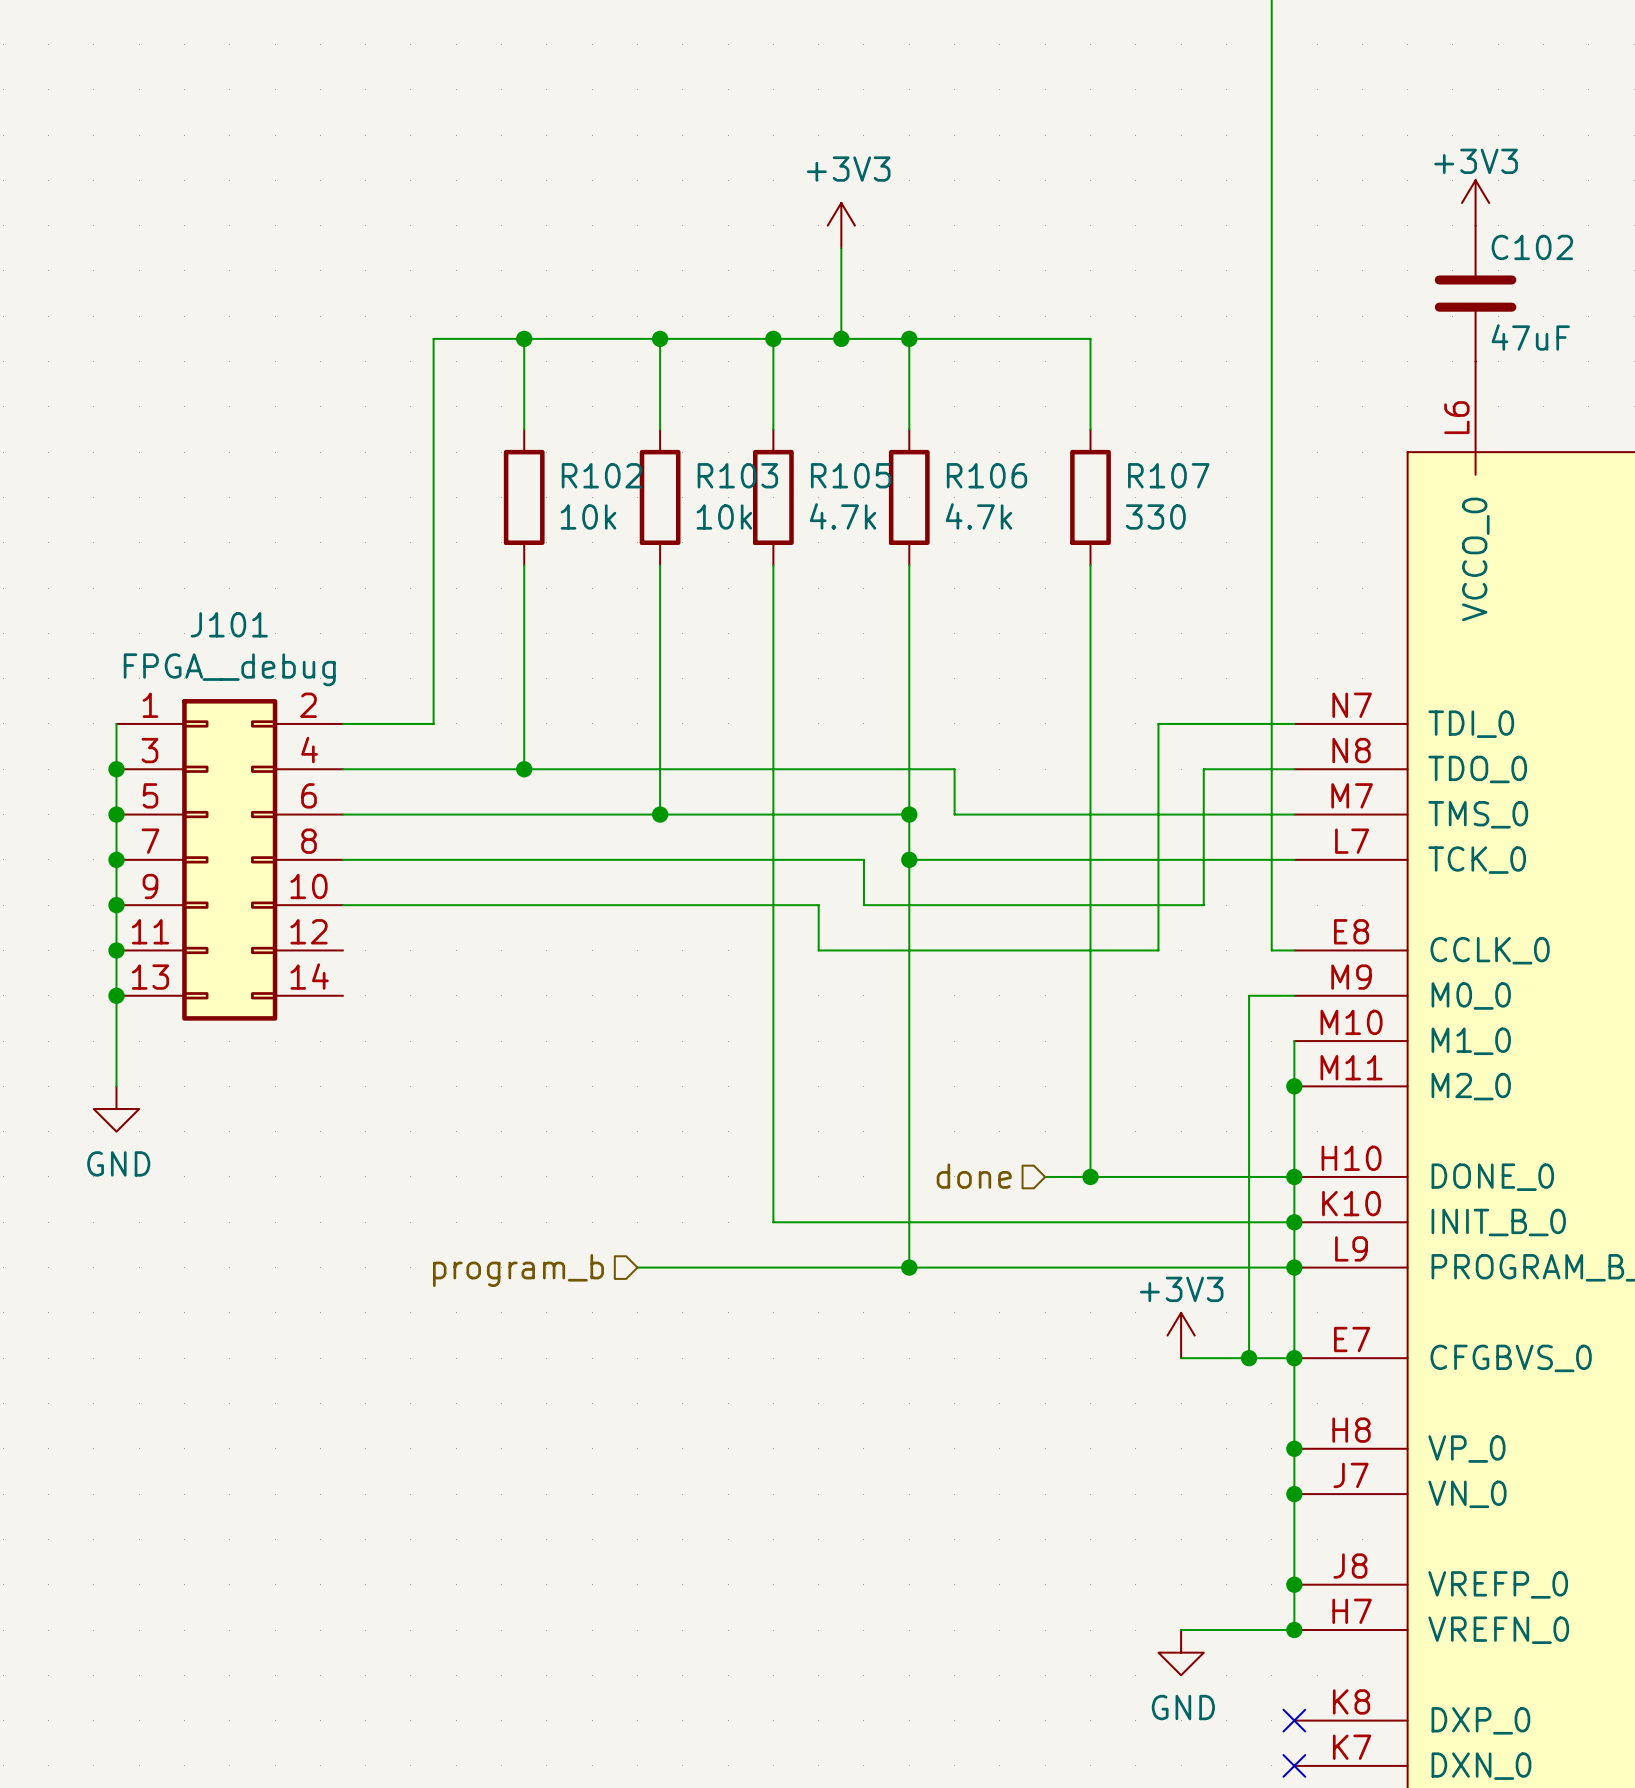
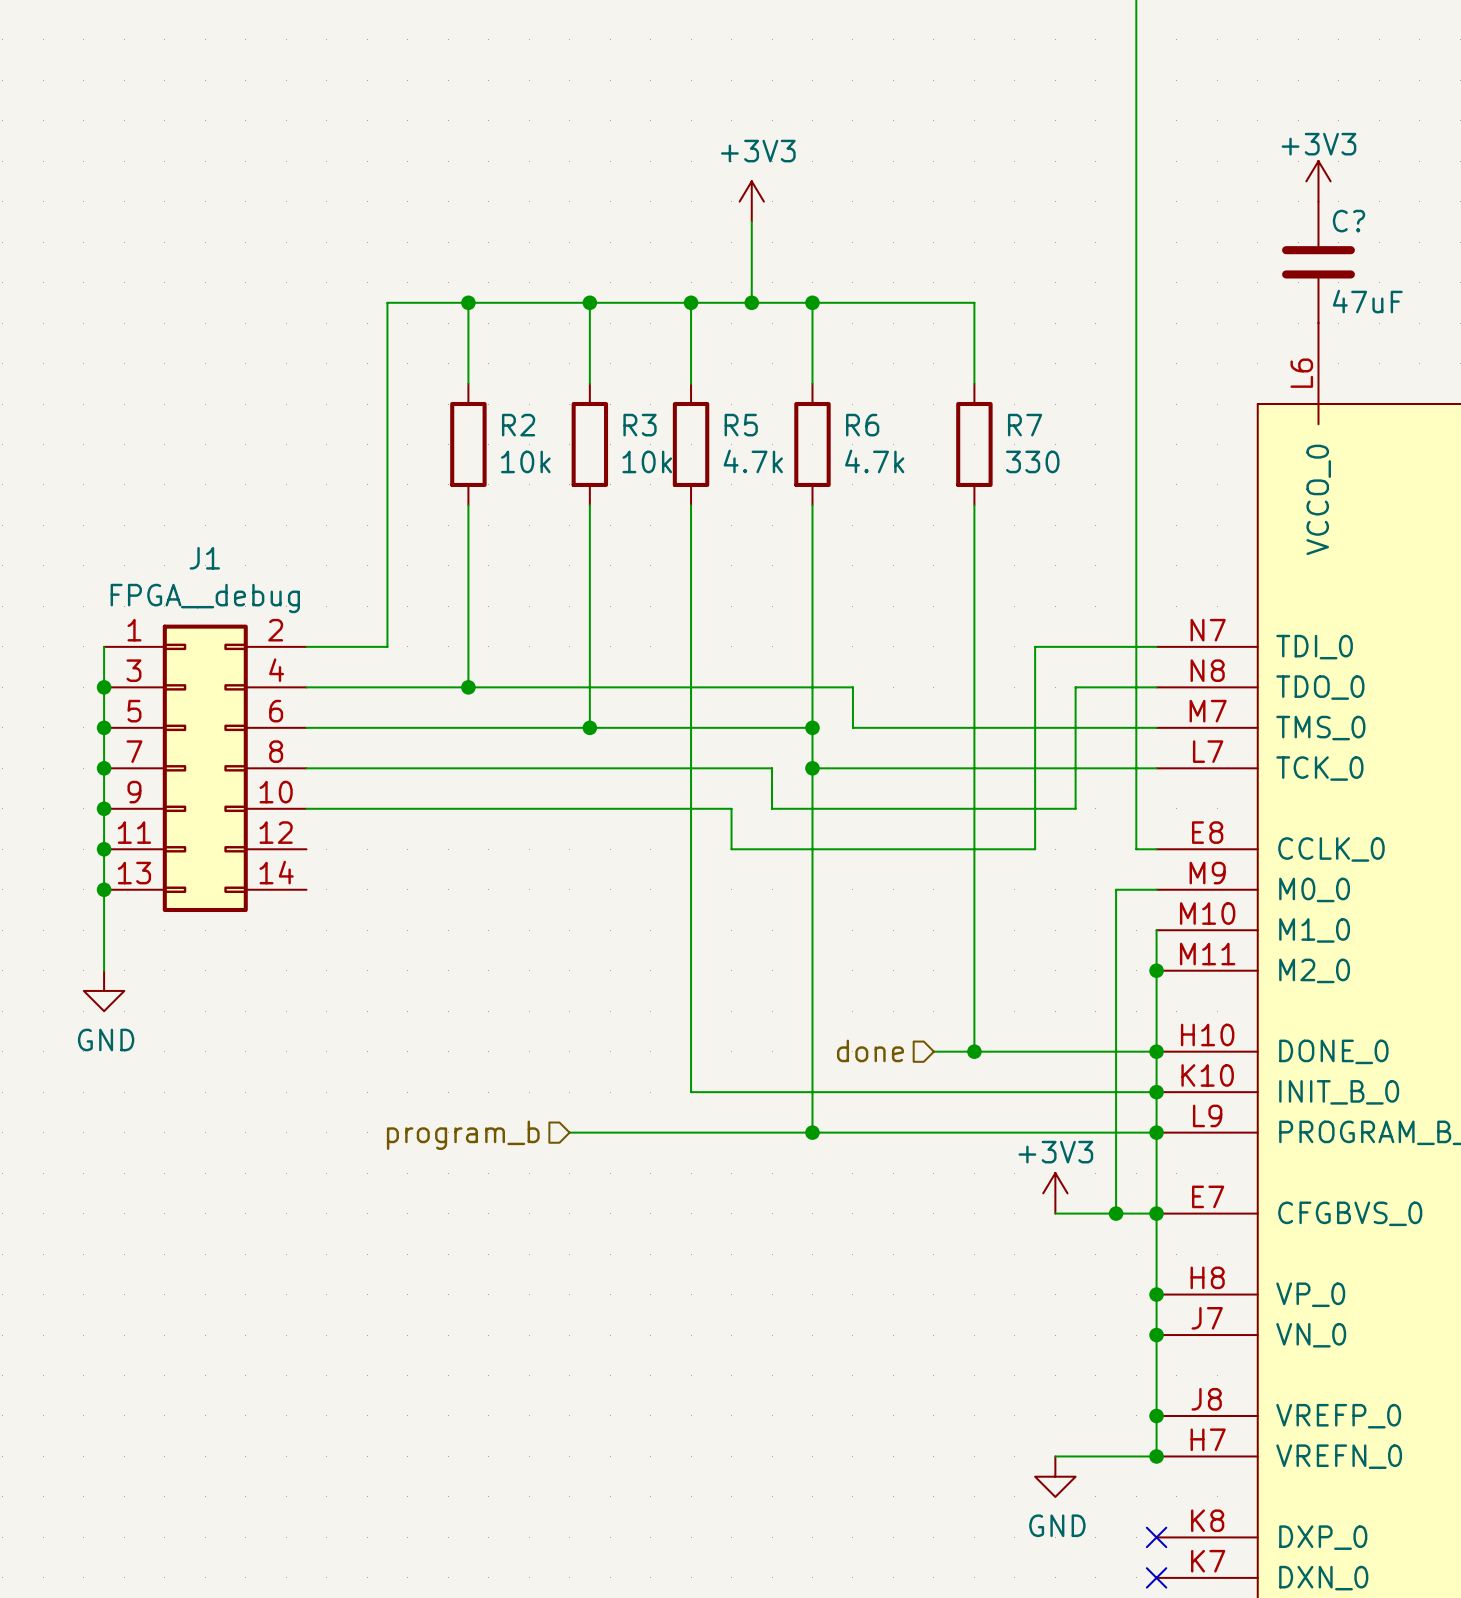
C102 name: C102 (1532, 247) -> C? (1348, 221)
R102 name: R102 (601, 475) -> R2 (518, 425)
R103 name: R103 (737, 475) -> R3 (640, 425)
R105 name: R105 (851, 475) -> R5 (741, 425)
R106 name: R106 (987, 475) -> R6 (862, 425)
R107 name: R107 (1168, 475) -> R7 (1025, 425)
J101 name: J101 (229, 624) -> J1 (204, 558)

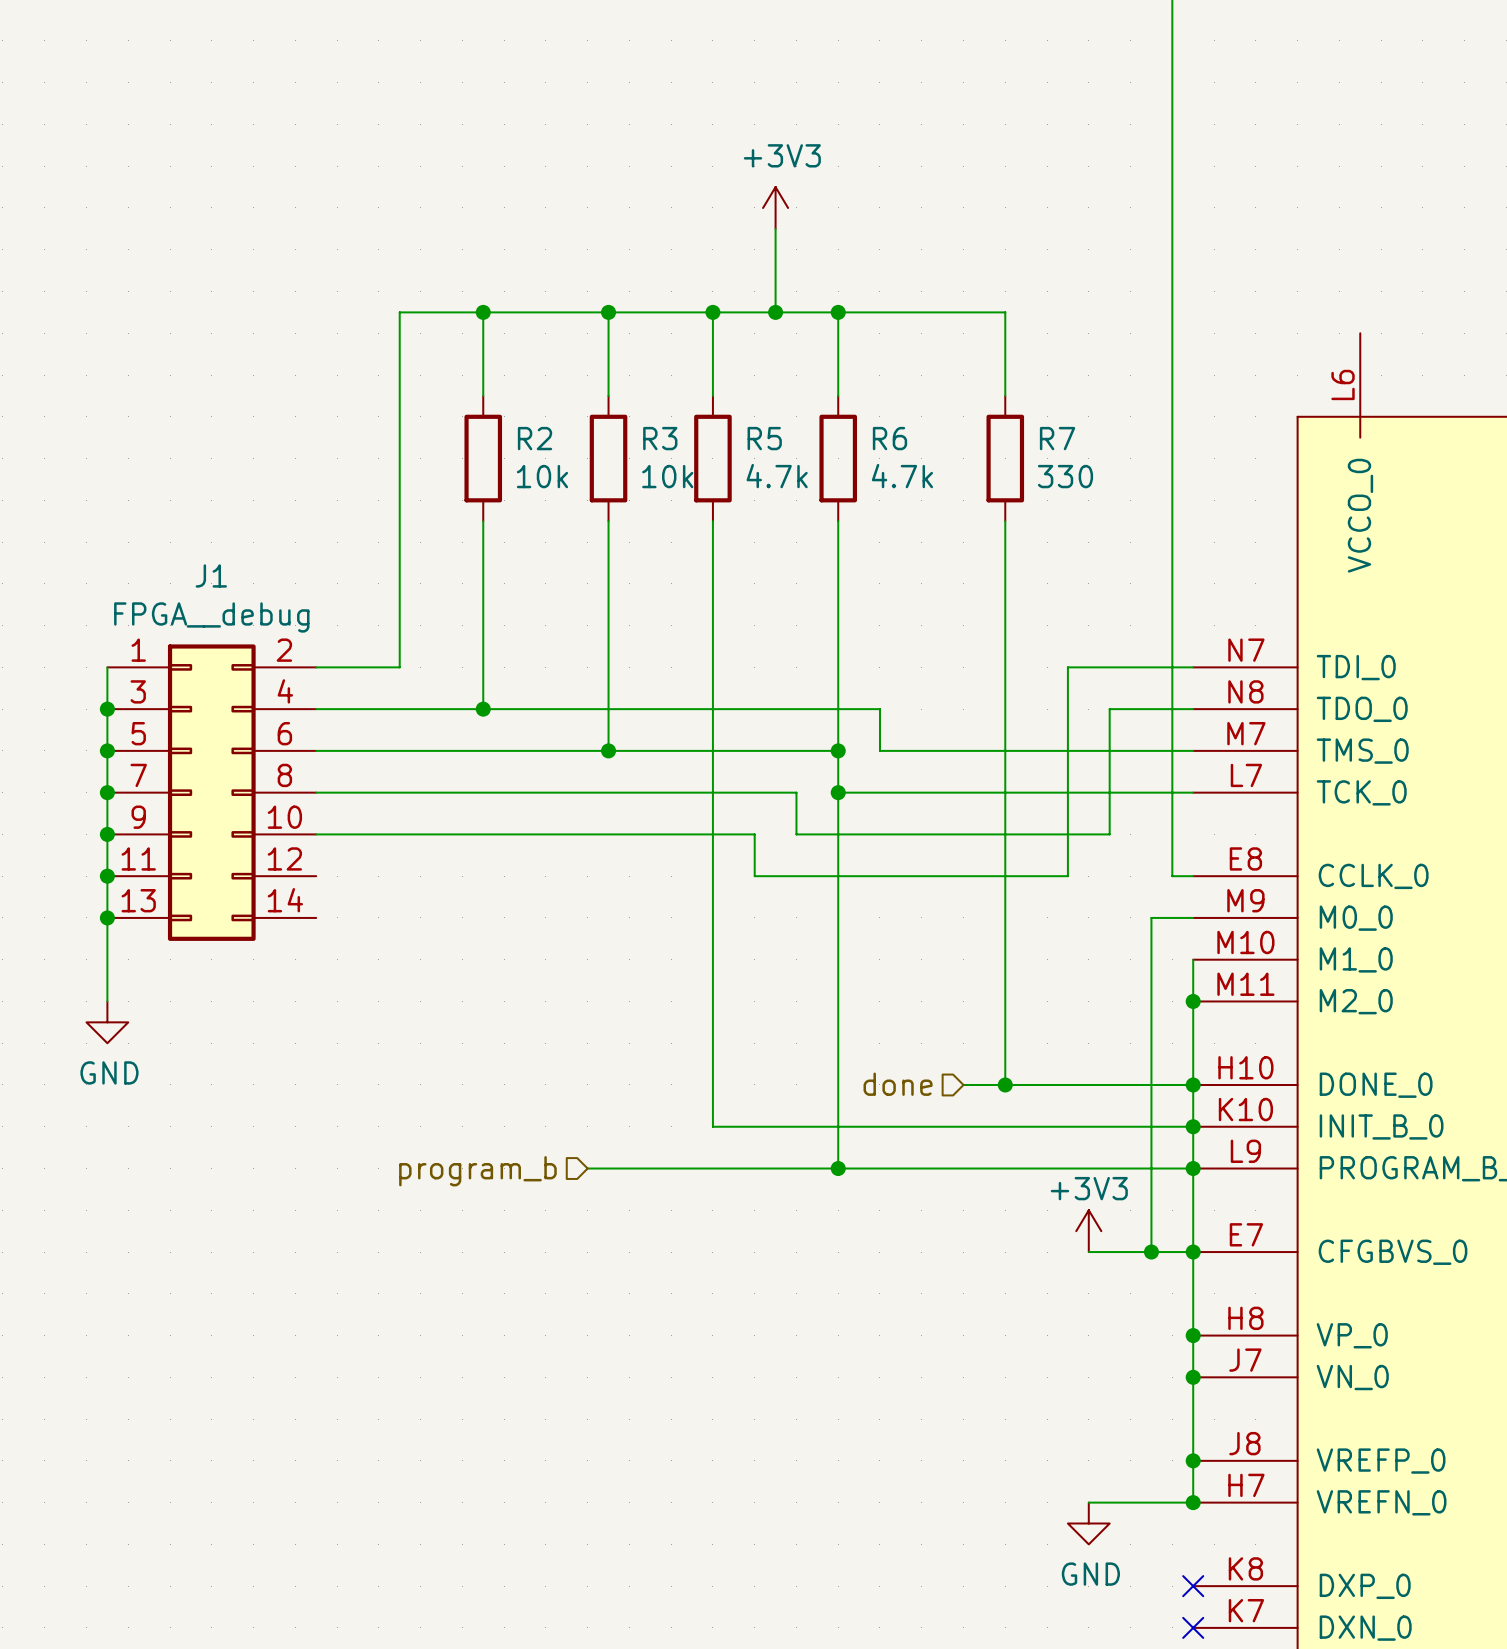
power symbol: +3V3 (1318, 181) -> none
C?: 47uF (1318, 262) -> none

